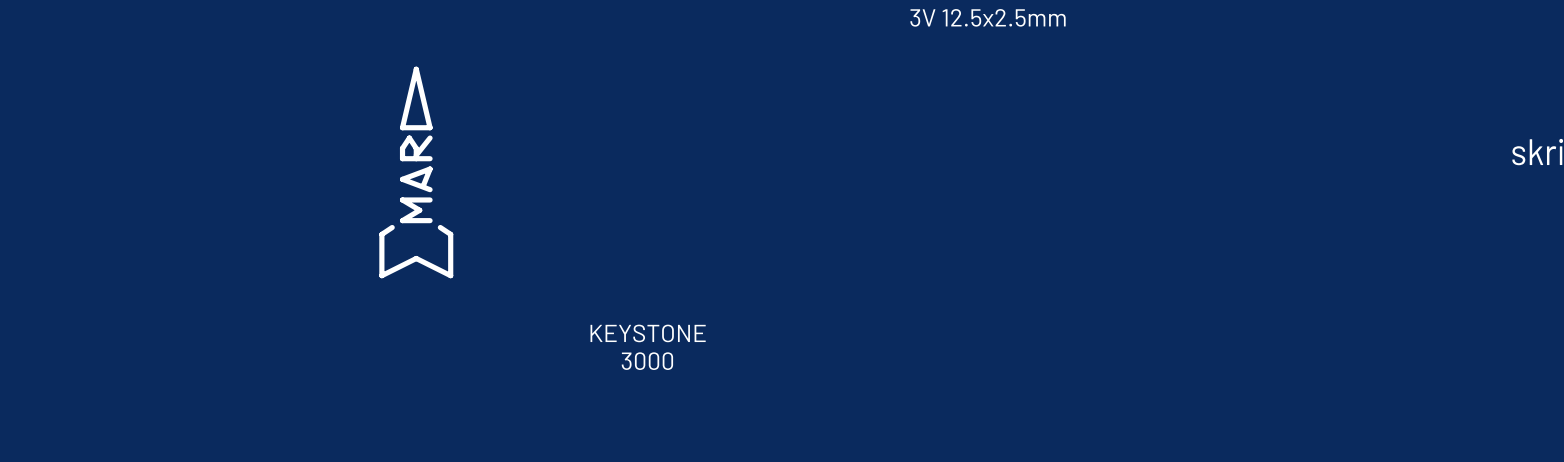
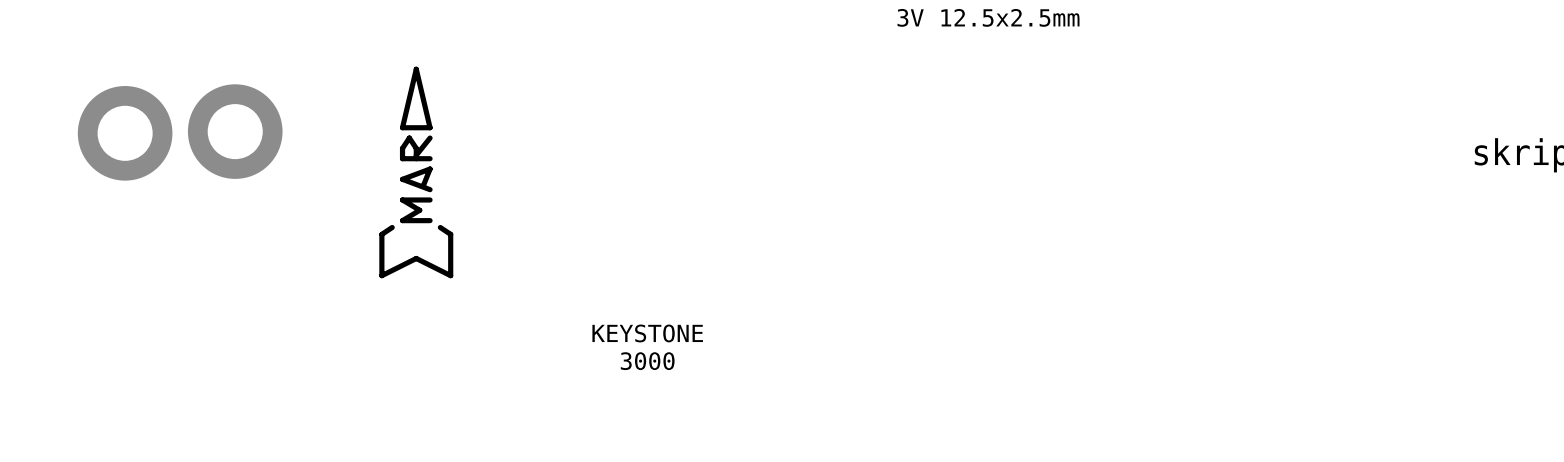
part: none -> (235, 131)
part: none -> (125, 133)

